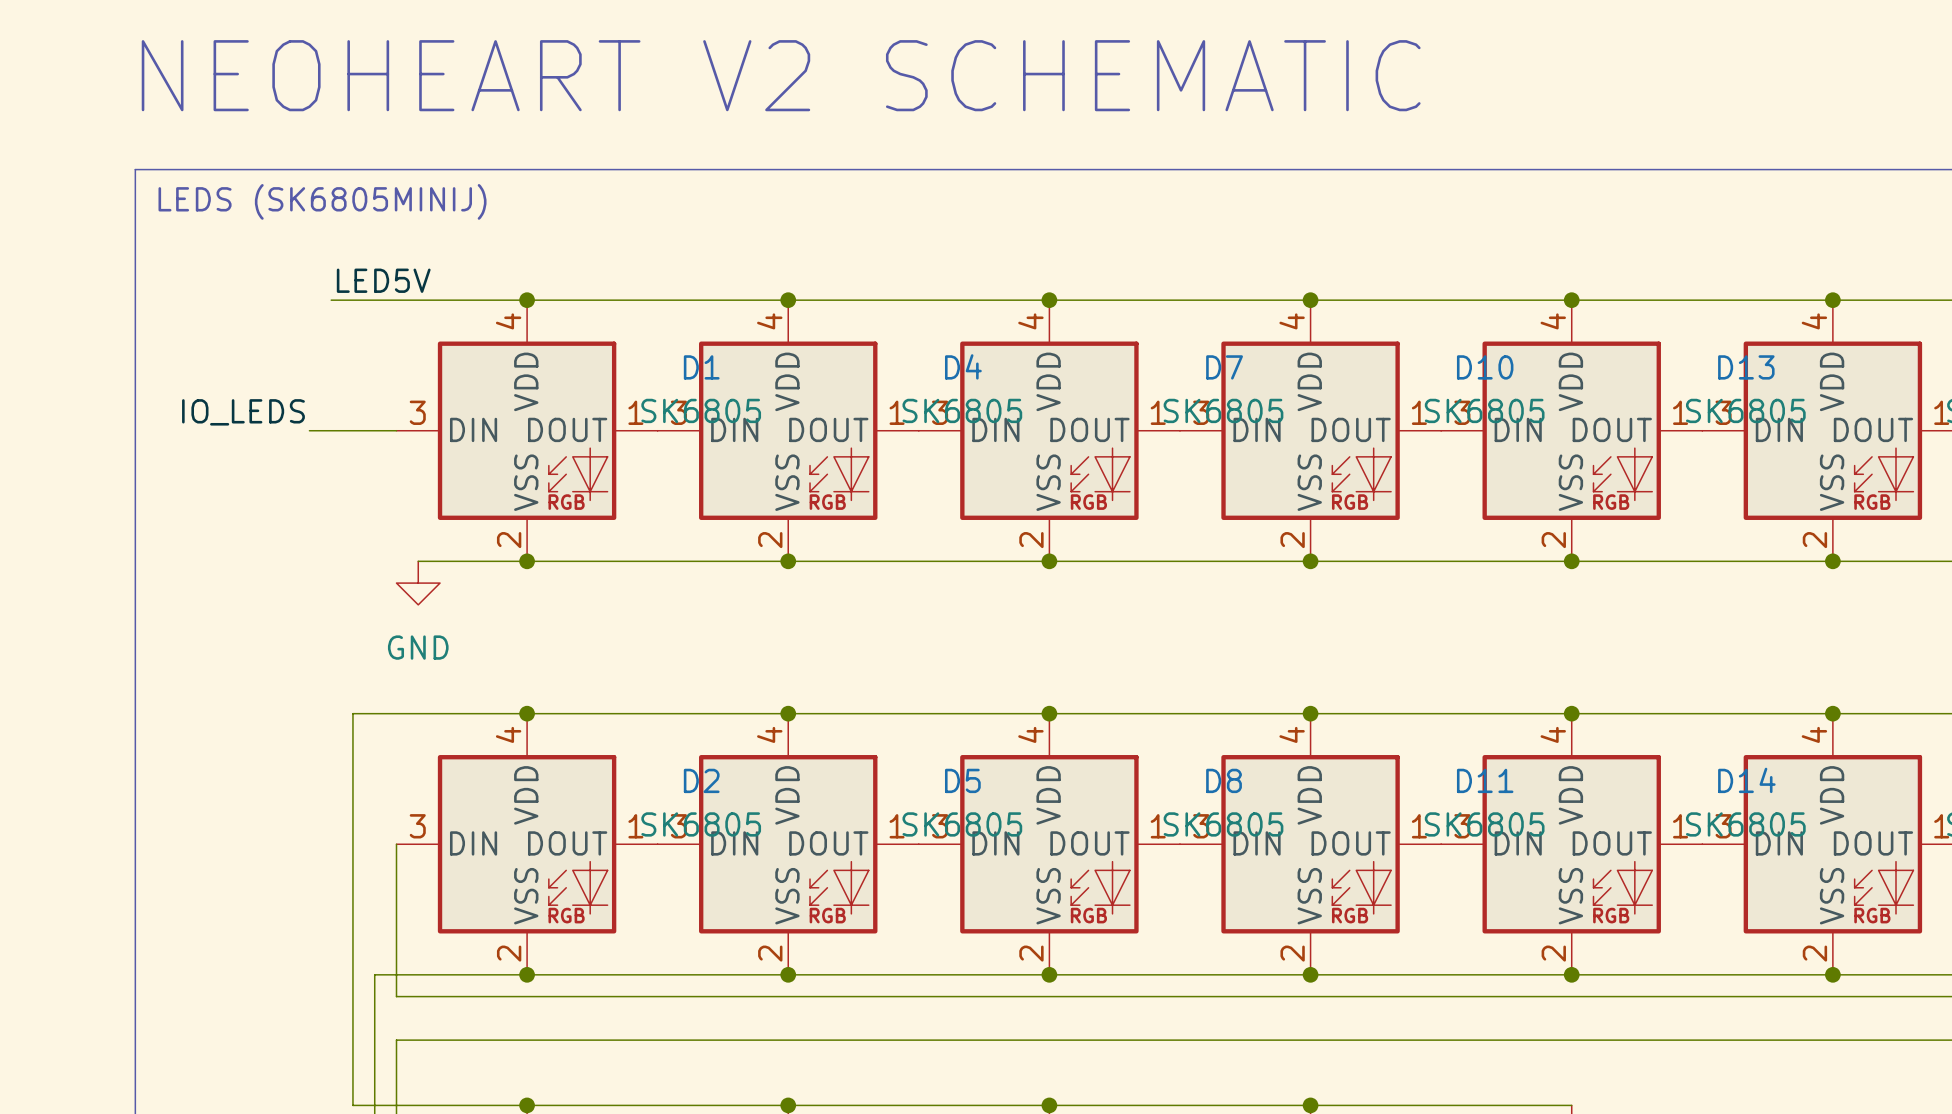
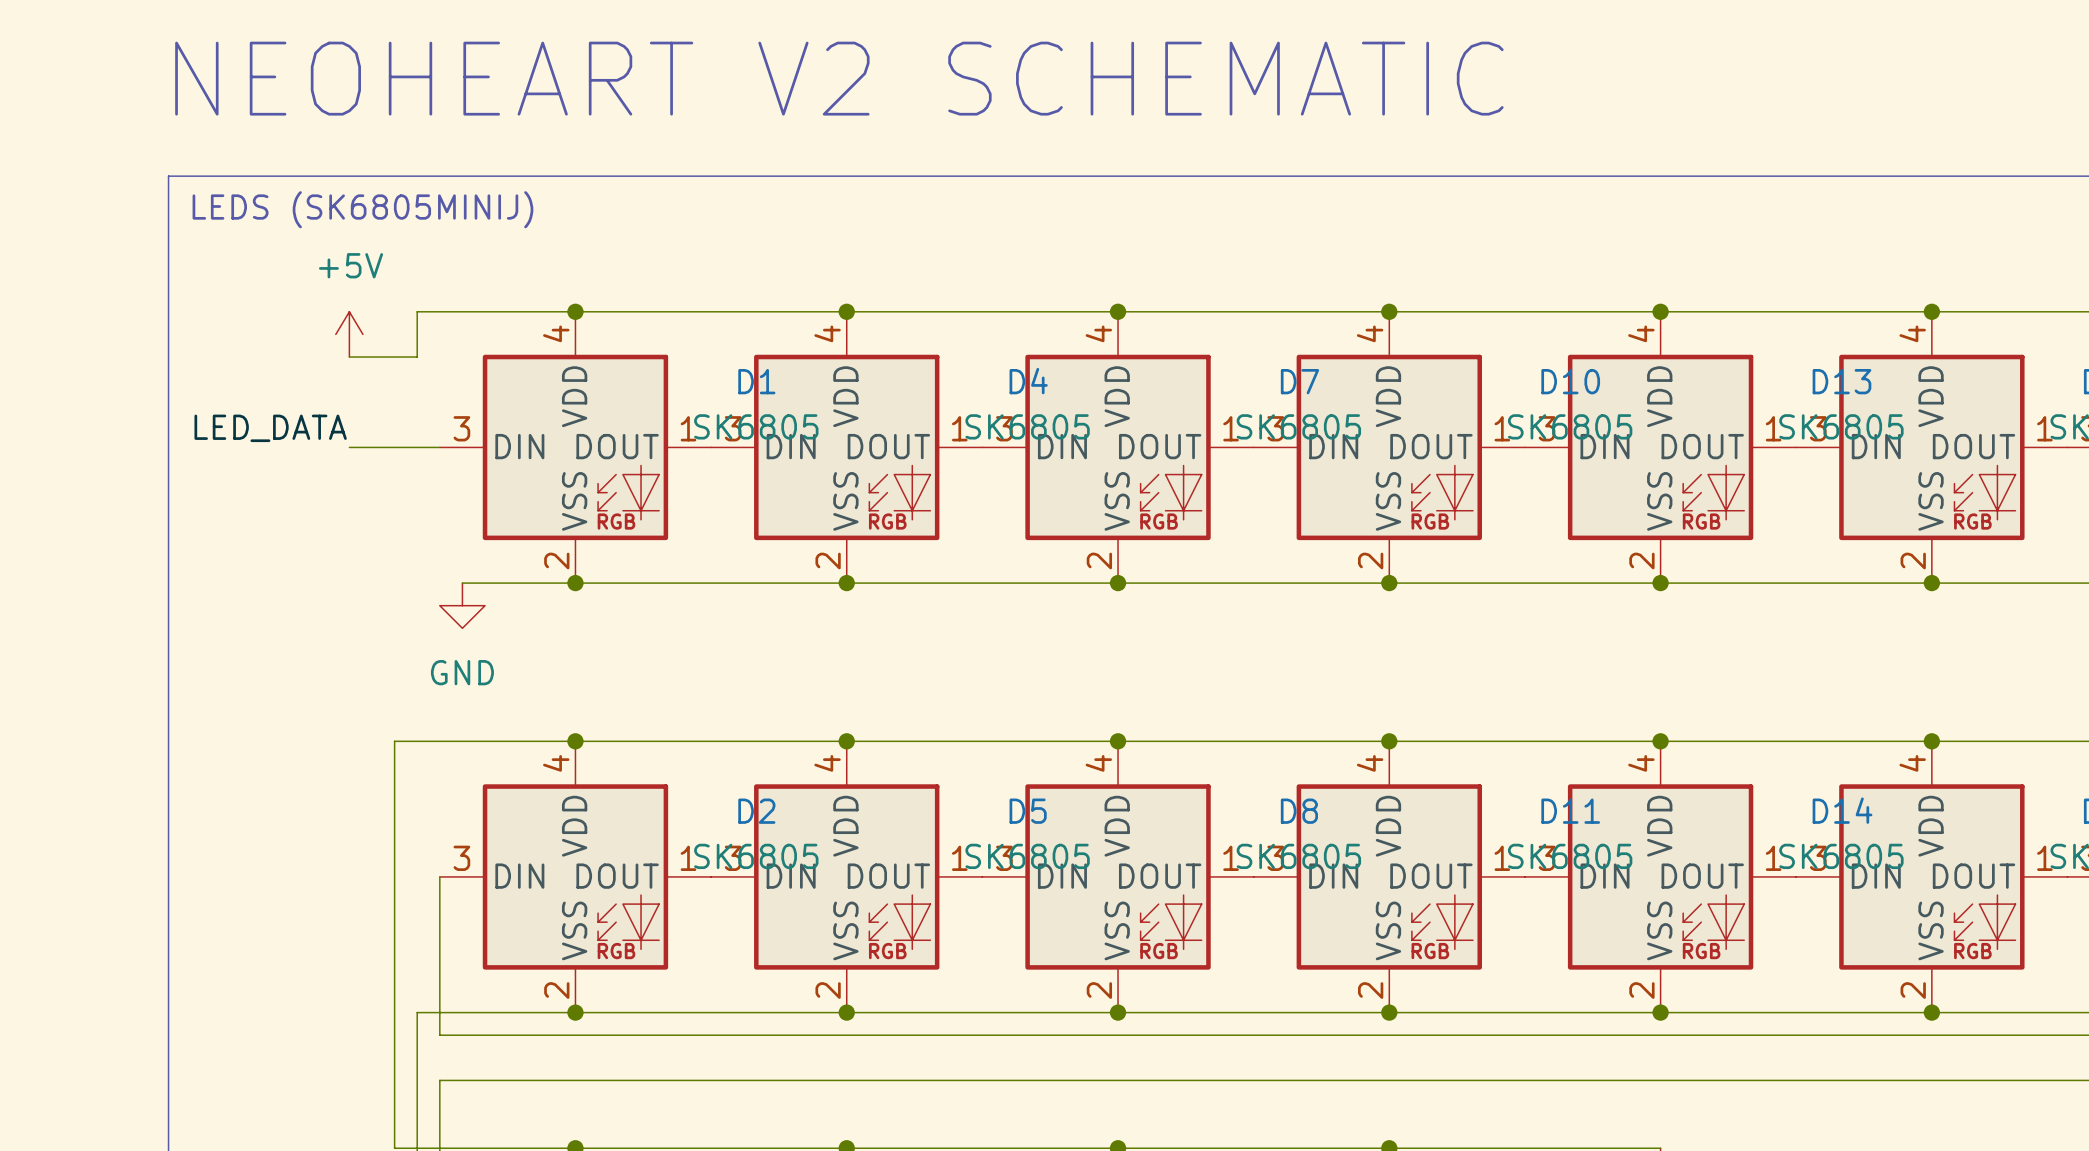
label: LED5V (383, 280) -> none
wire: (331, 300) (374, 300) -> (349, 357) (417, 357) (417, 311)
power symbol: none -> +5V (349, 334)
label: IO_LEDS (243, 412) -> LED_DATA (270, 428)

